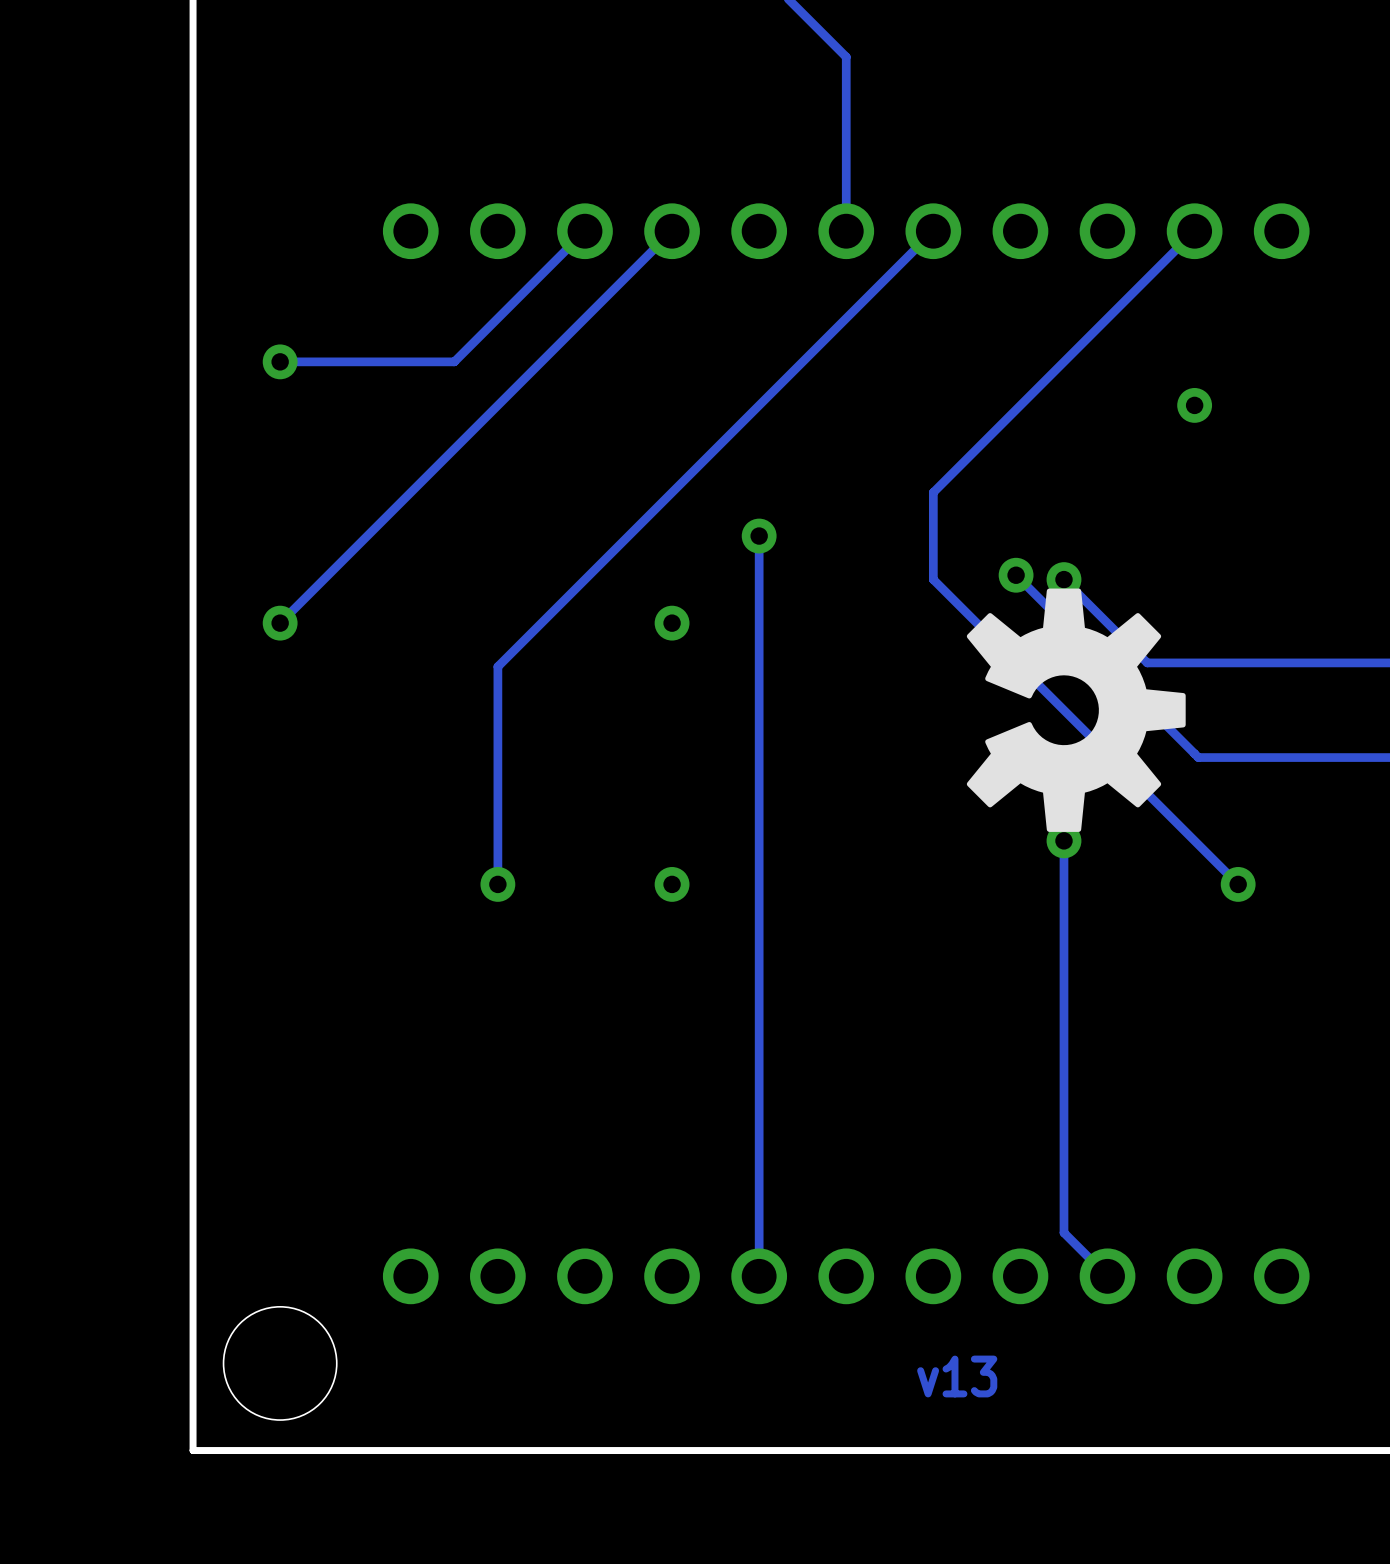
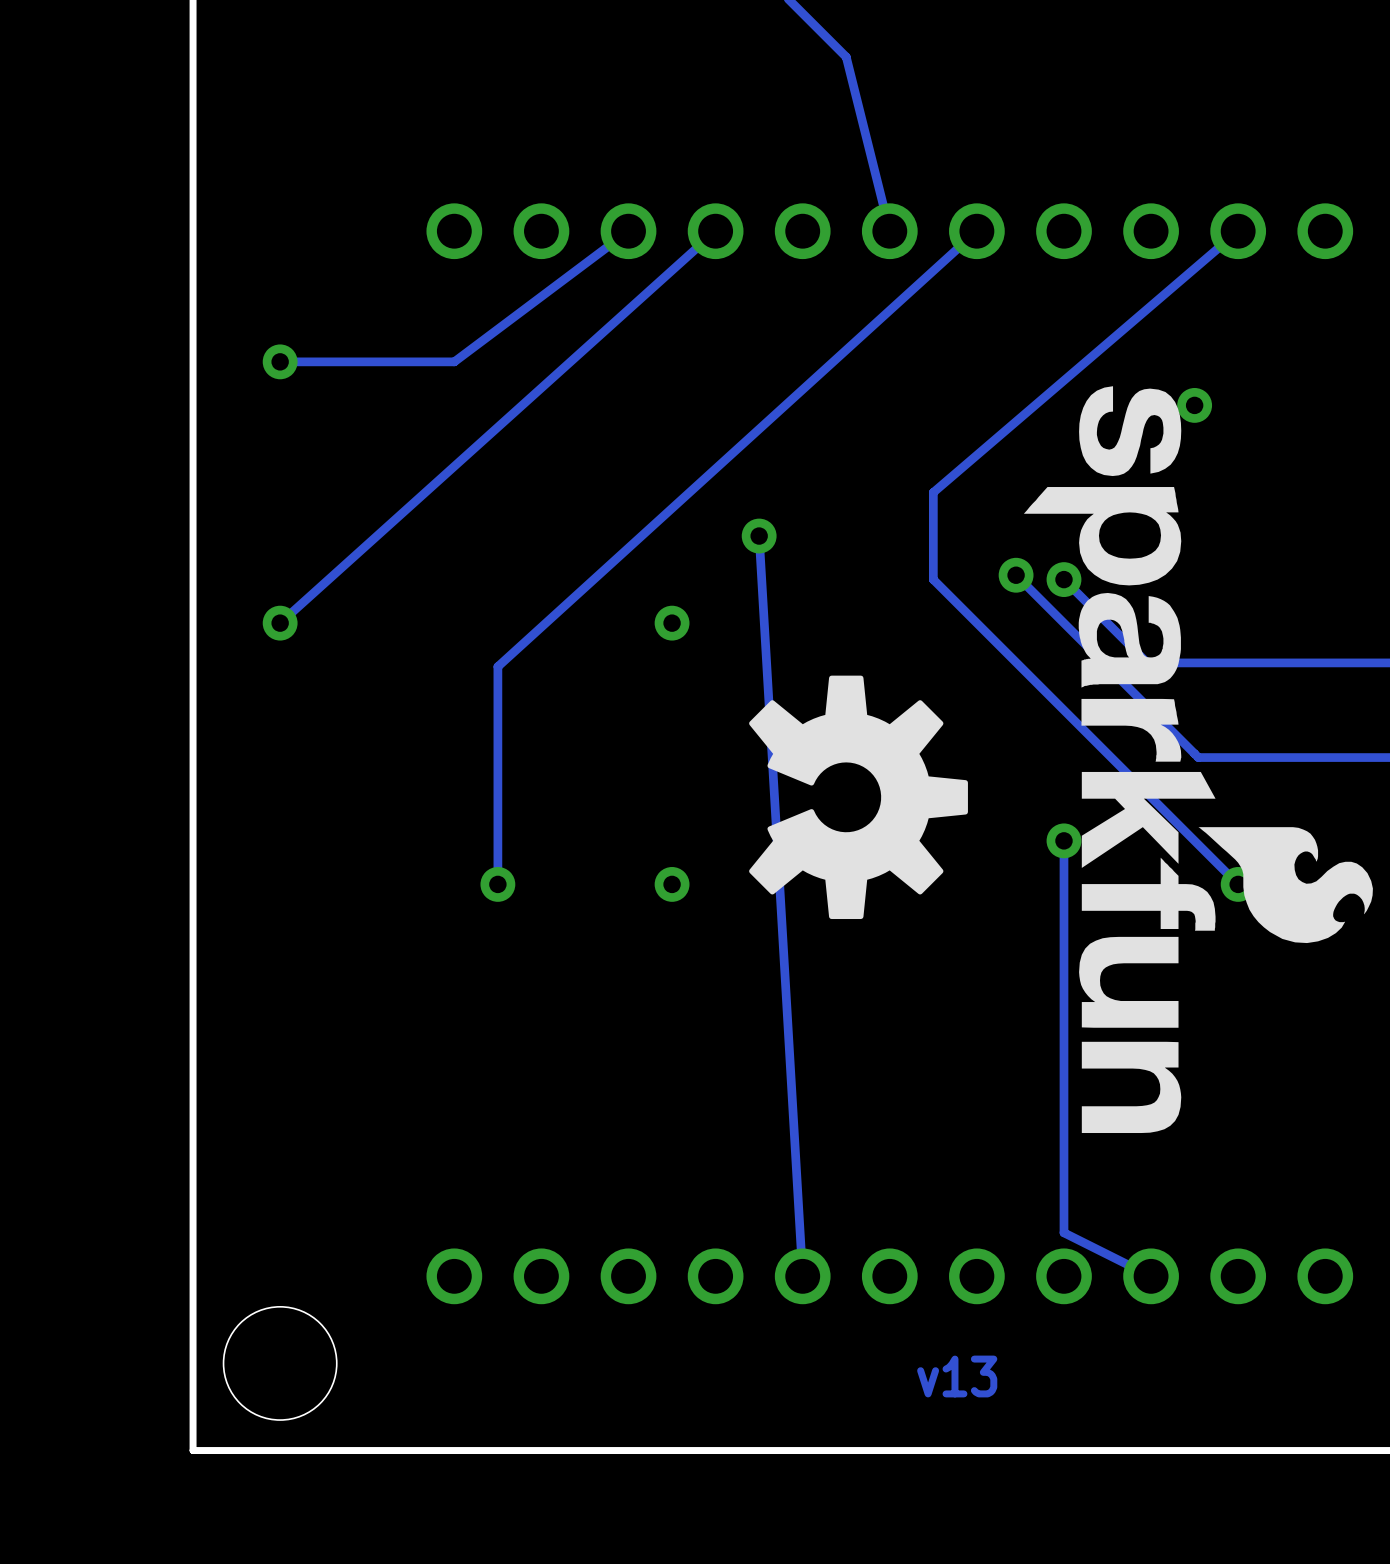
track: (846, 57) (846, 231) -> (846, 57) (889, 231)
track: (584, 231) (454, 361) -> (628, 231) (454, 361)
track: (672, 231) (280, 623) -> (715, 231) (280, 623)
part position: (846, 231) -> (889, 231)
track: (933, 231) (497, 666) -> (976, 231) (497, 666)
track: (1194, 231) (933, 492) -> (1238, 231) (933, 492)
drawing: none -> [1023, 386, 1373, 1134]
track: (759, 536) (759, 1276) -> (759, 536) (802, 1276)
drawing position: (1076, 710) -> (858, 797)
track: (1063, 1232) (1107, 1276) -> (1063, 1232) (1151, 1276)
part position: (846, 1276) -> (889, 1276)

